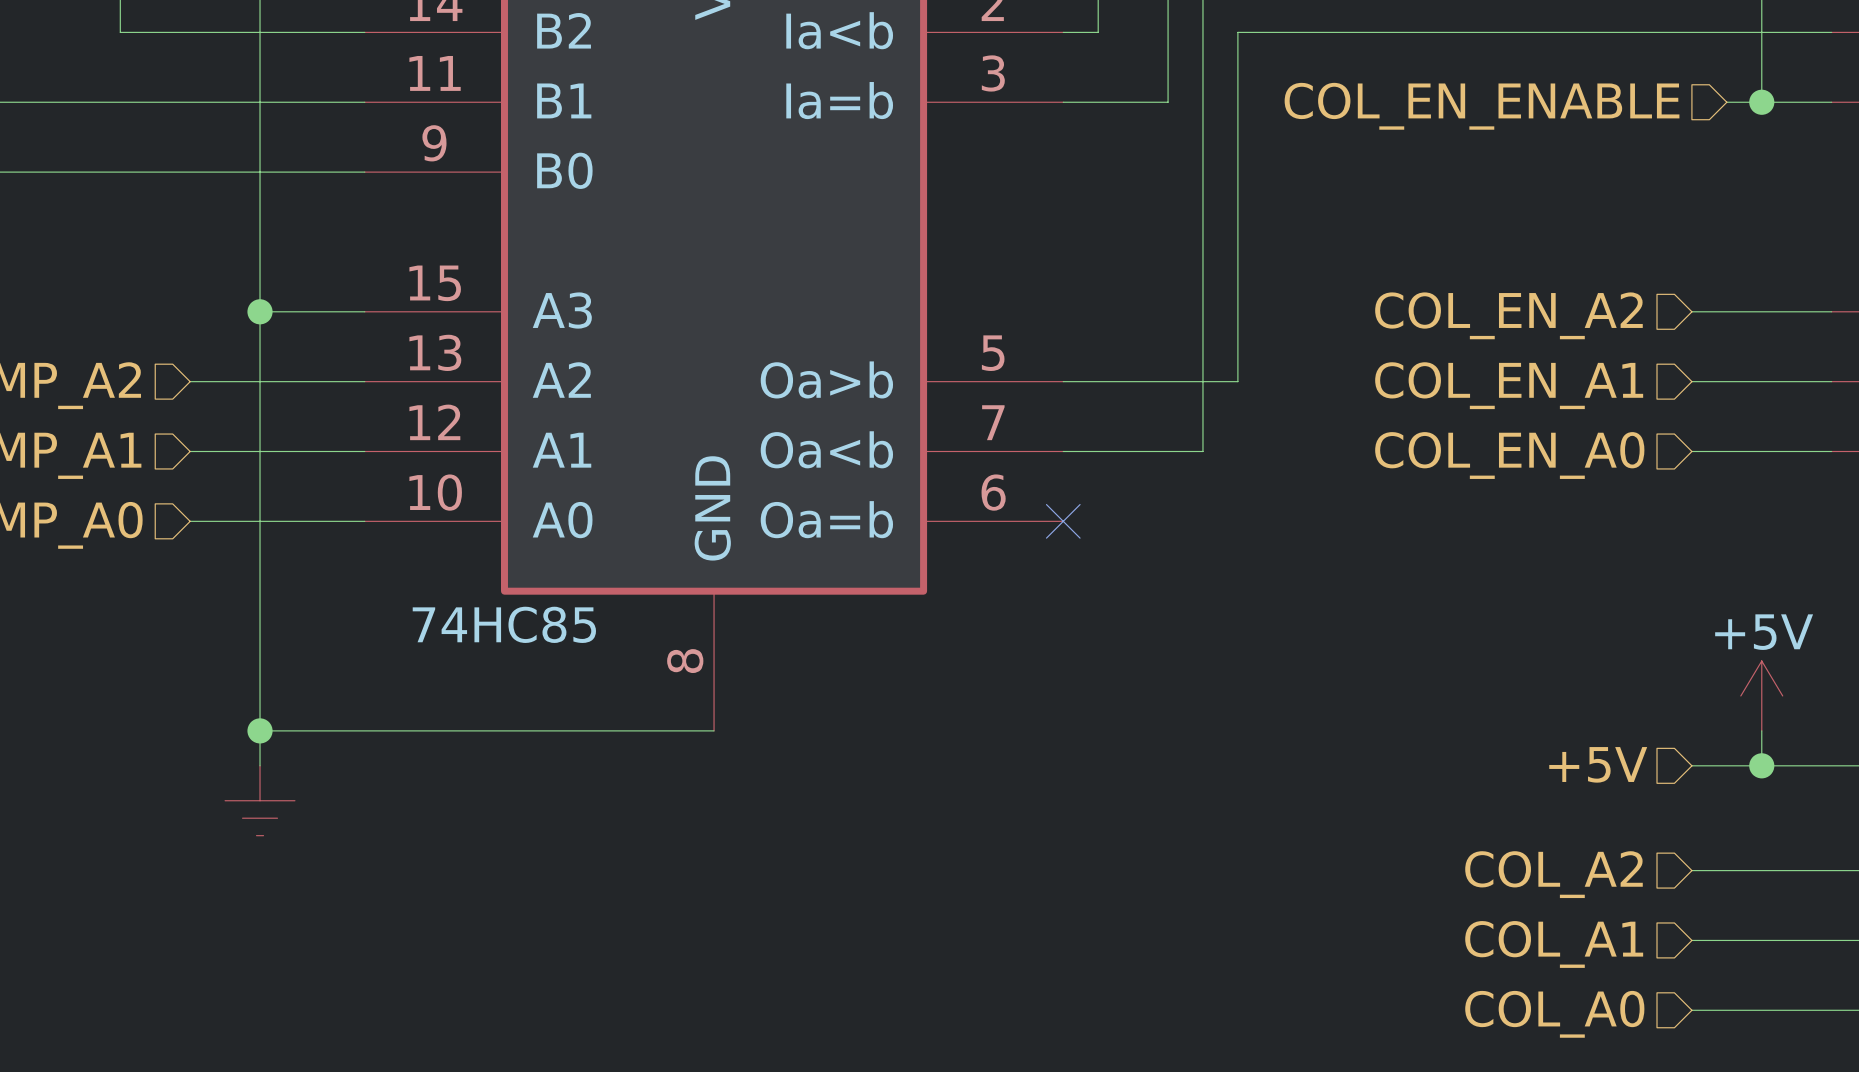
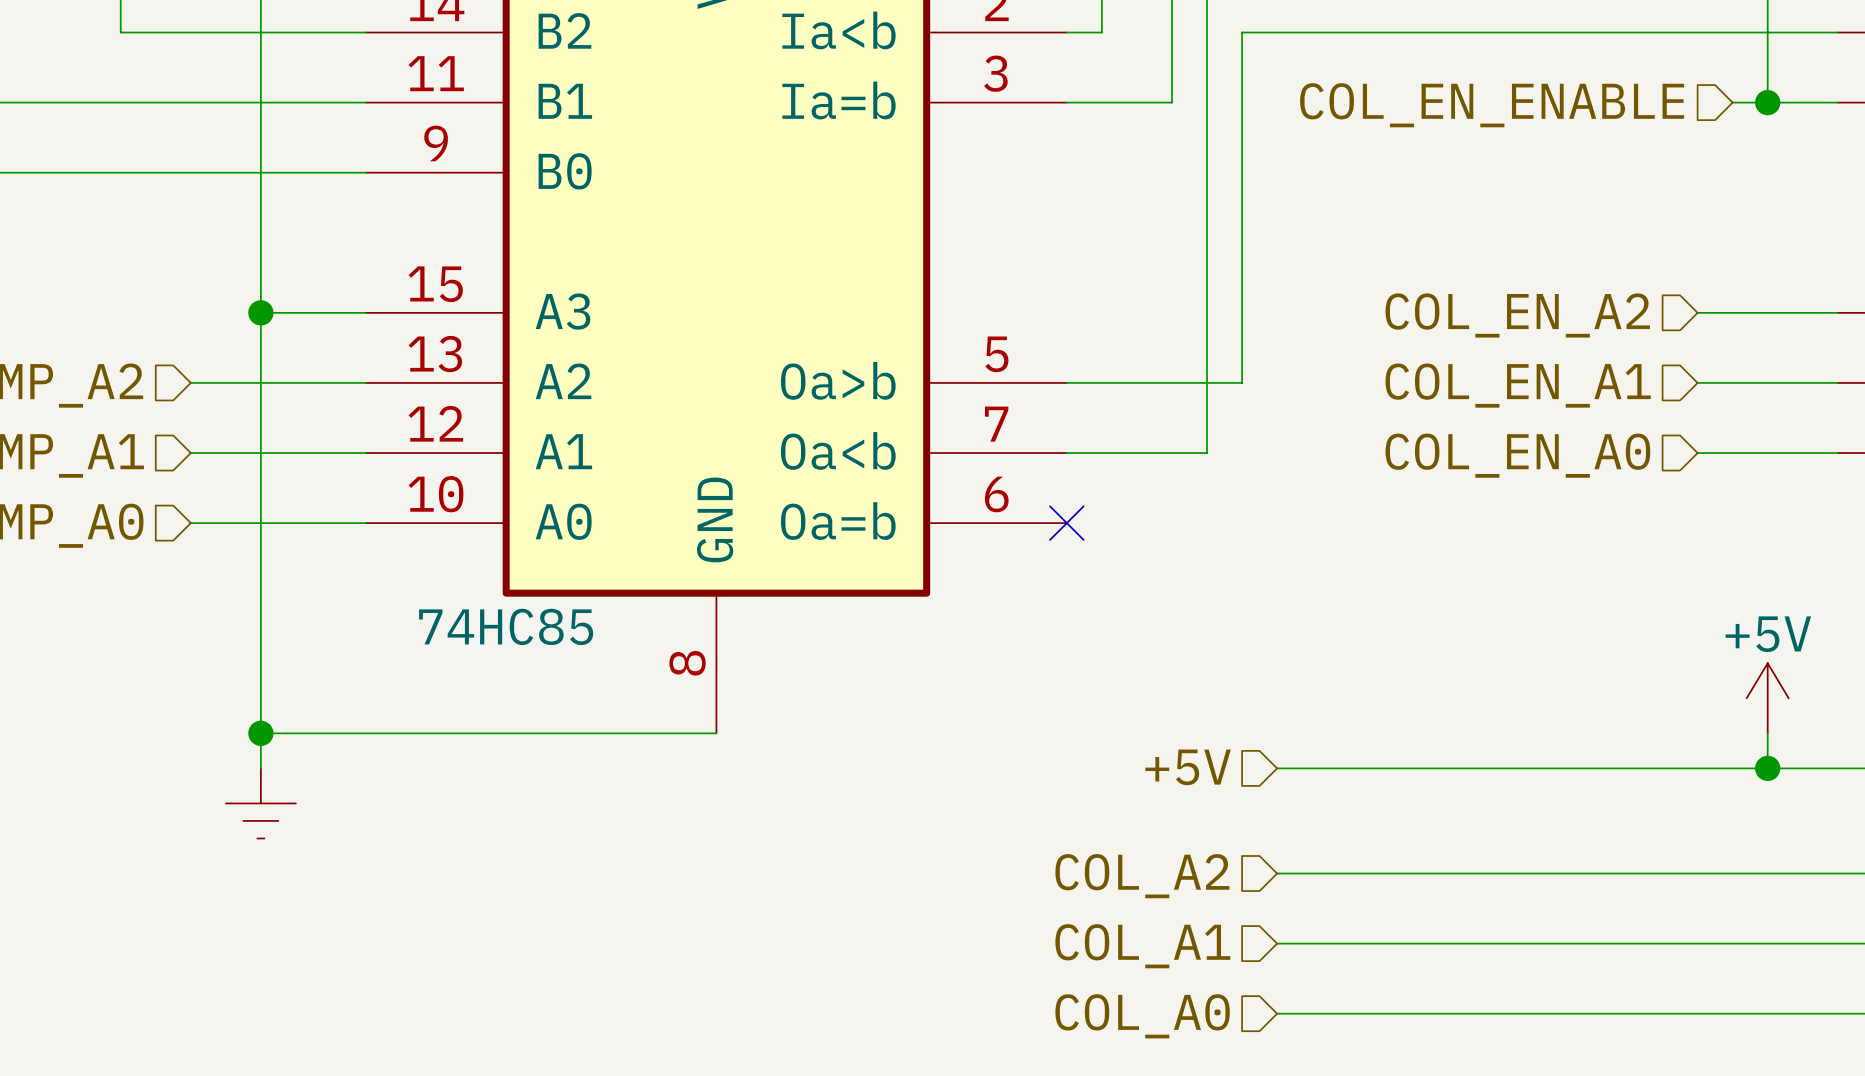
hierarchical label position: +5V (1598, 764) -> +5V (1188, 767)
wire: none -> (1277, 768) (1697, 768)
wire: none -> (1277, 873) (1697, 873)
hierarchical label position: COL_A2 (1553, 874) -> COL_A2 (1142, 876)
wire: none -> (1277, 943) (1697, 943)
hierarchical label position: COL_A1 (1554, 944) -> COL_A1 (1142, 946)
wire: none -> (1277, 1013) (1697, 1013)
hierarchical label position: COL_A0 (1554, 1014) -> COL_A0 (1142, 1016)

